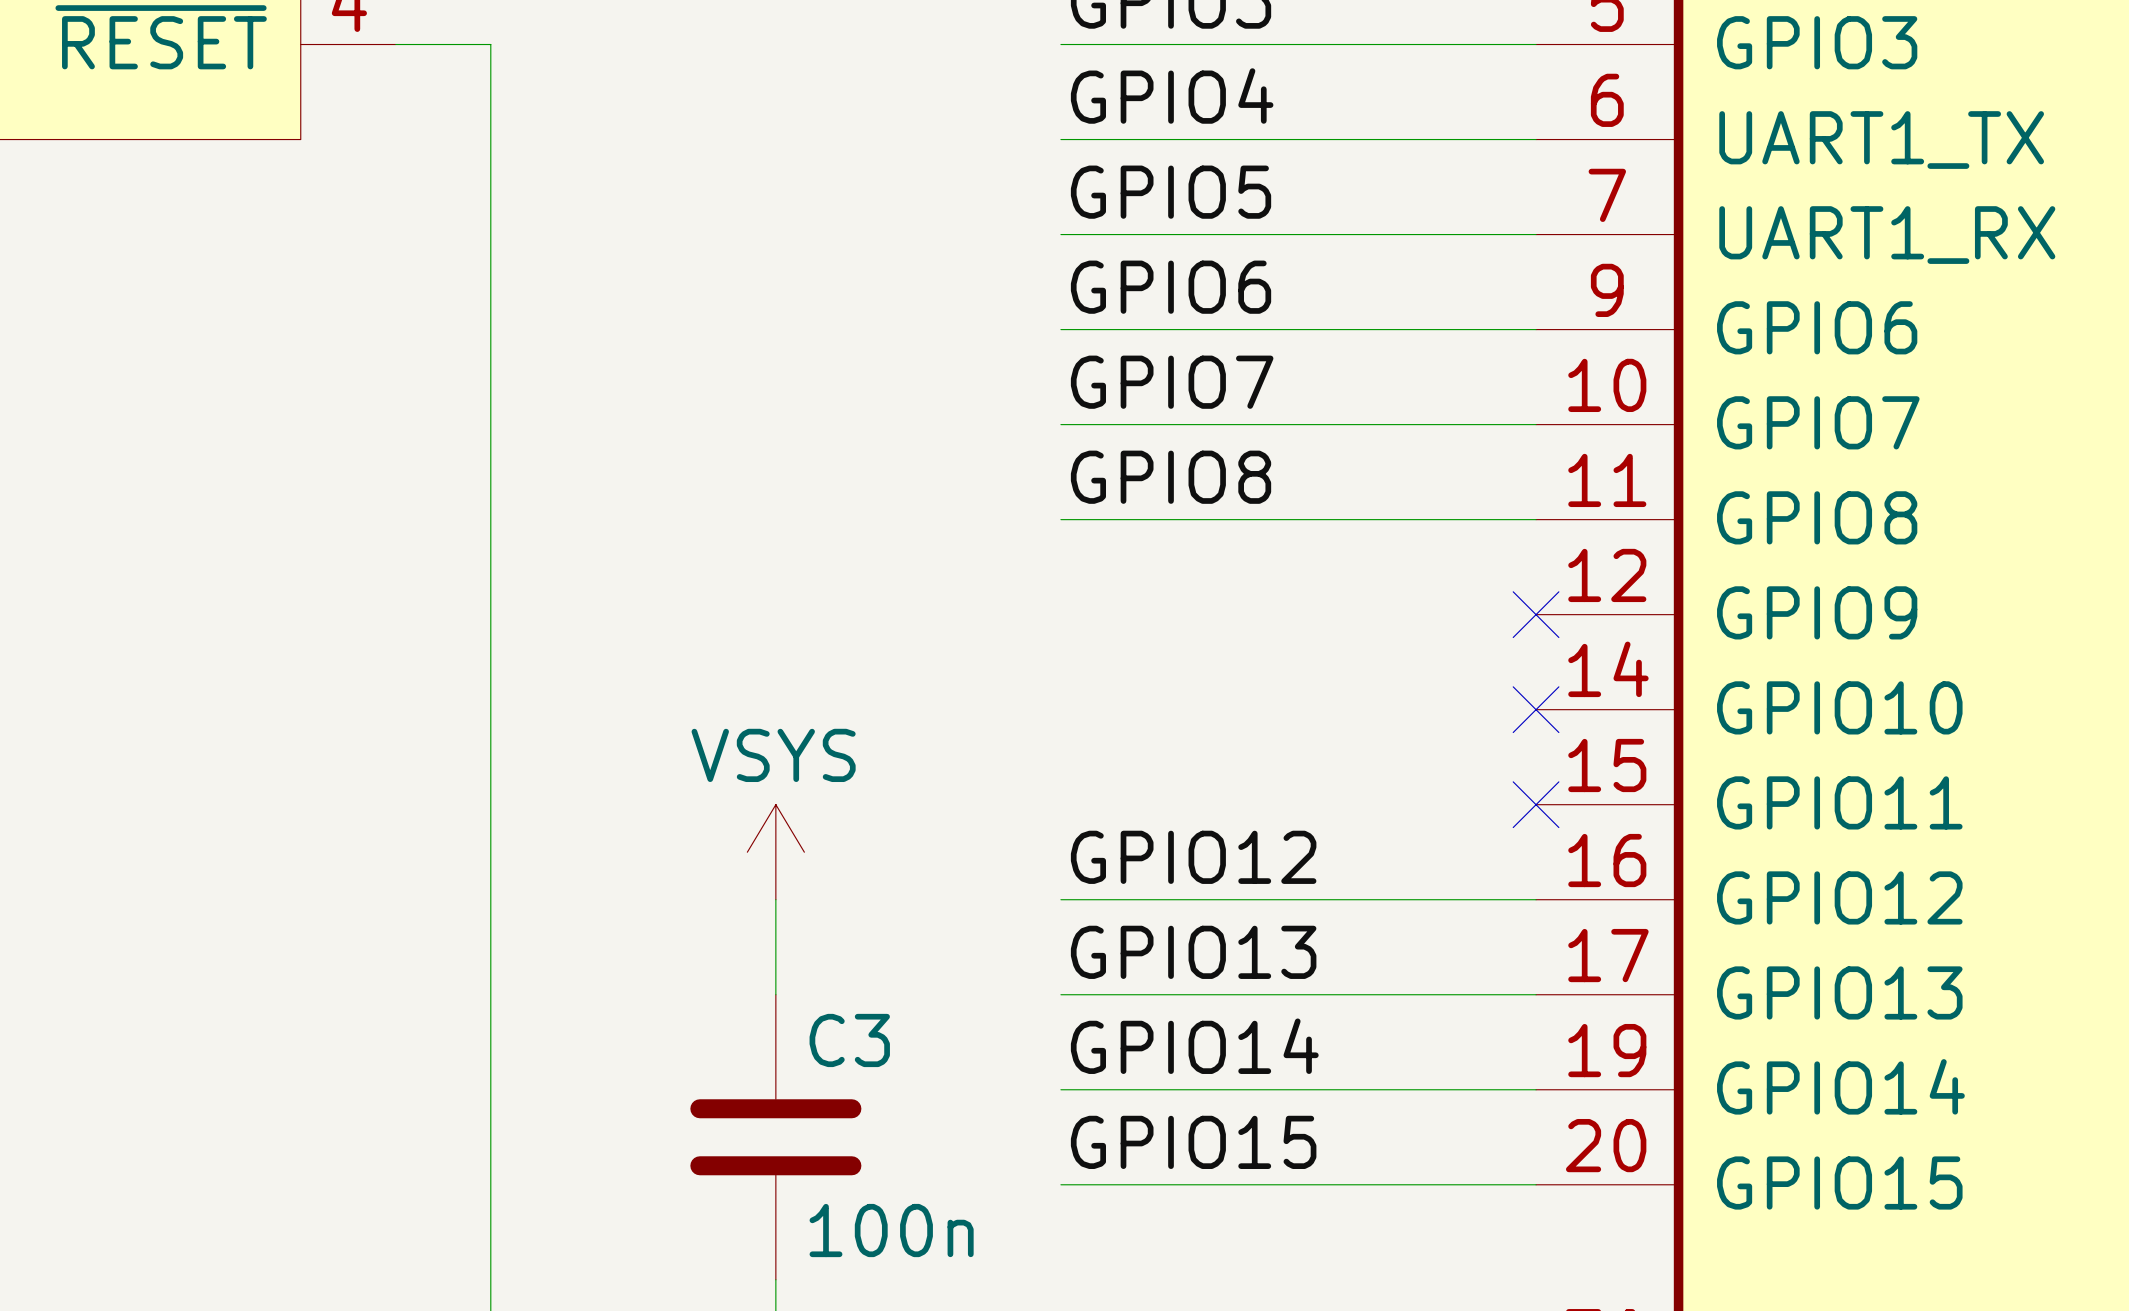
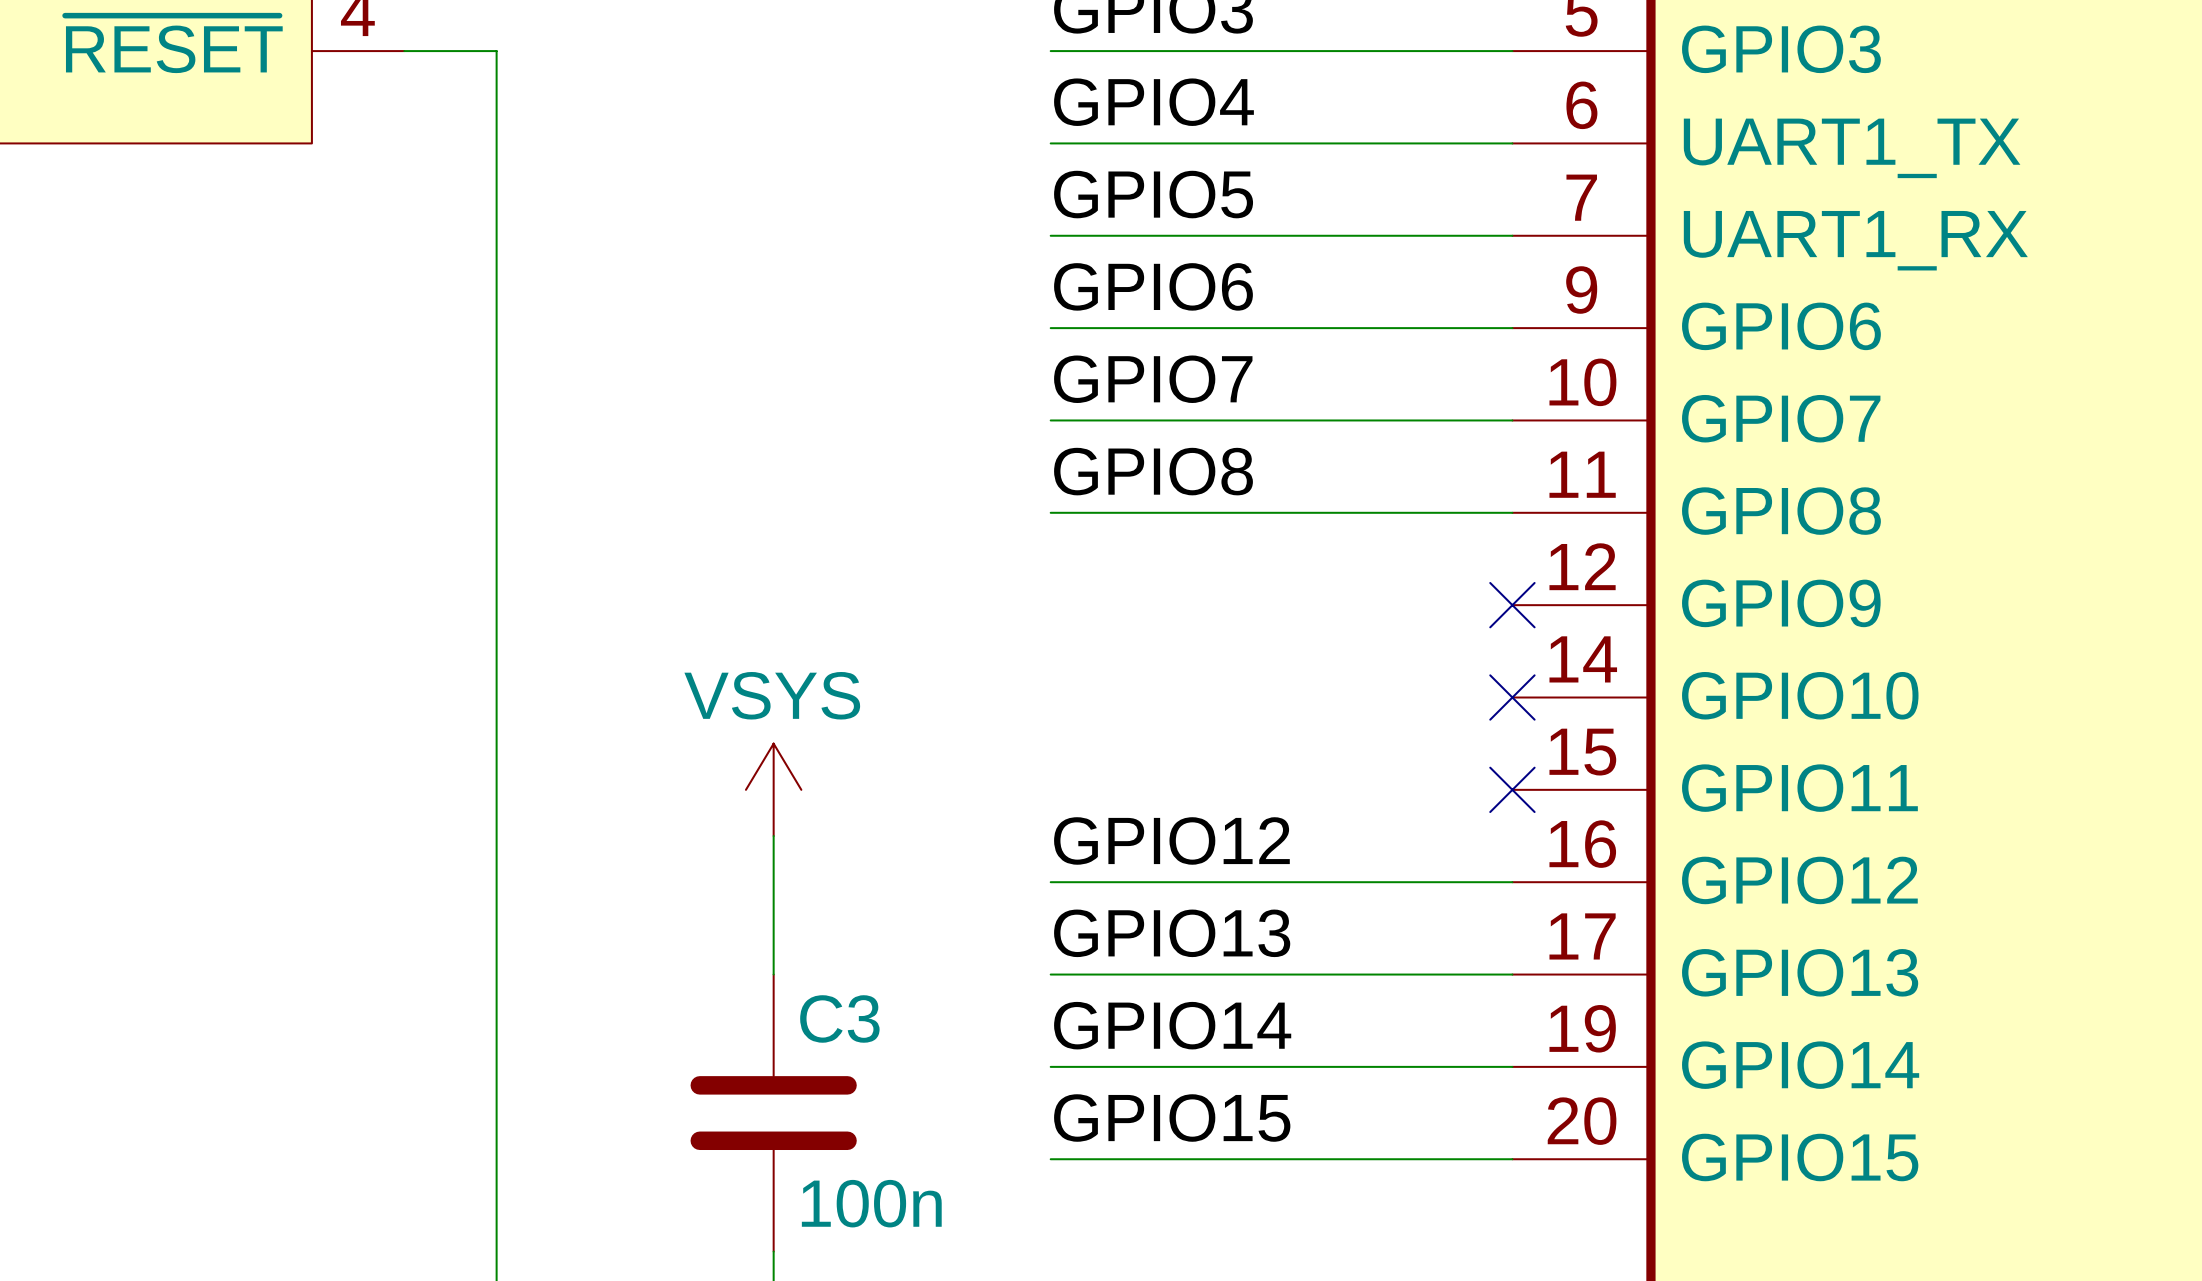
power symbol position: VSYS (775, 852) -> VSYS (773, 789)

